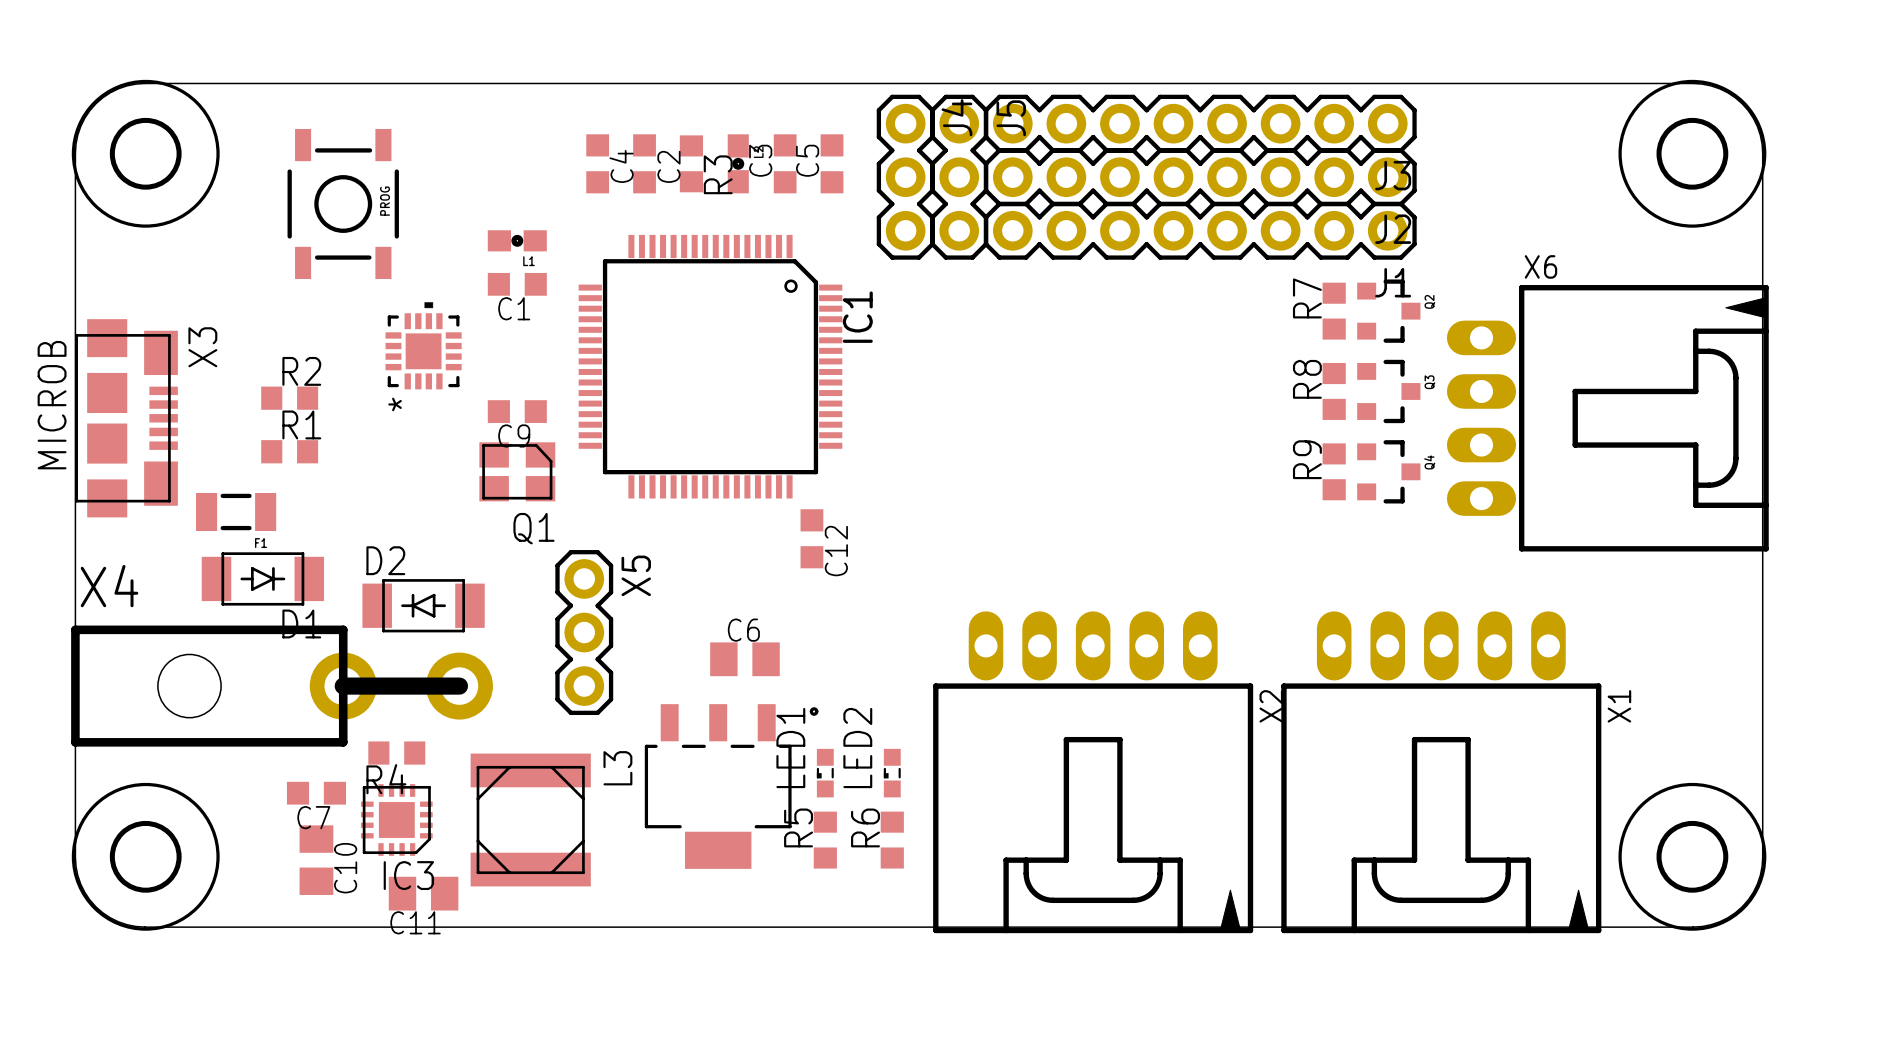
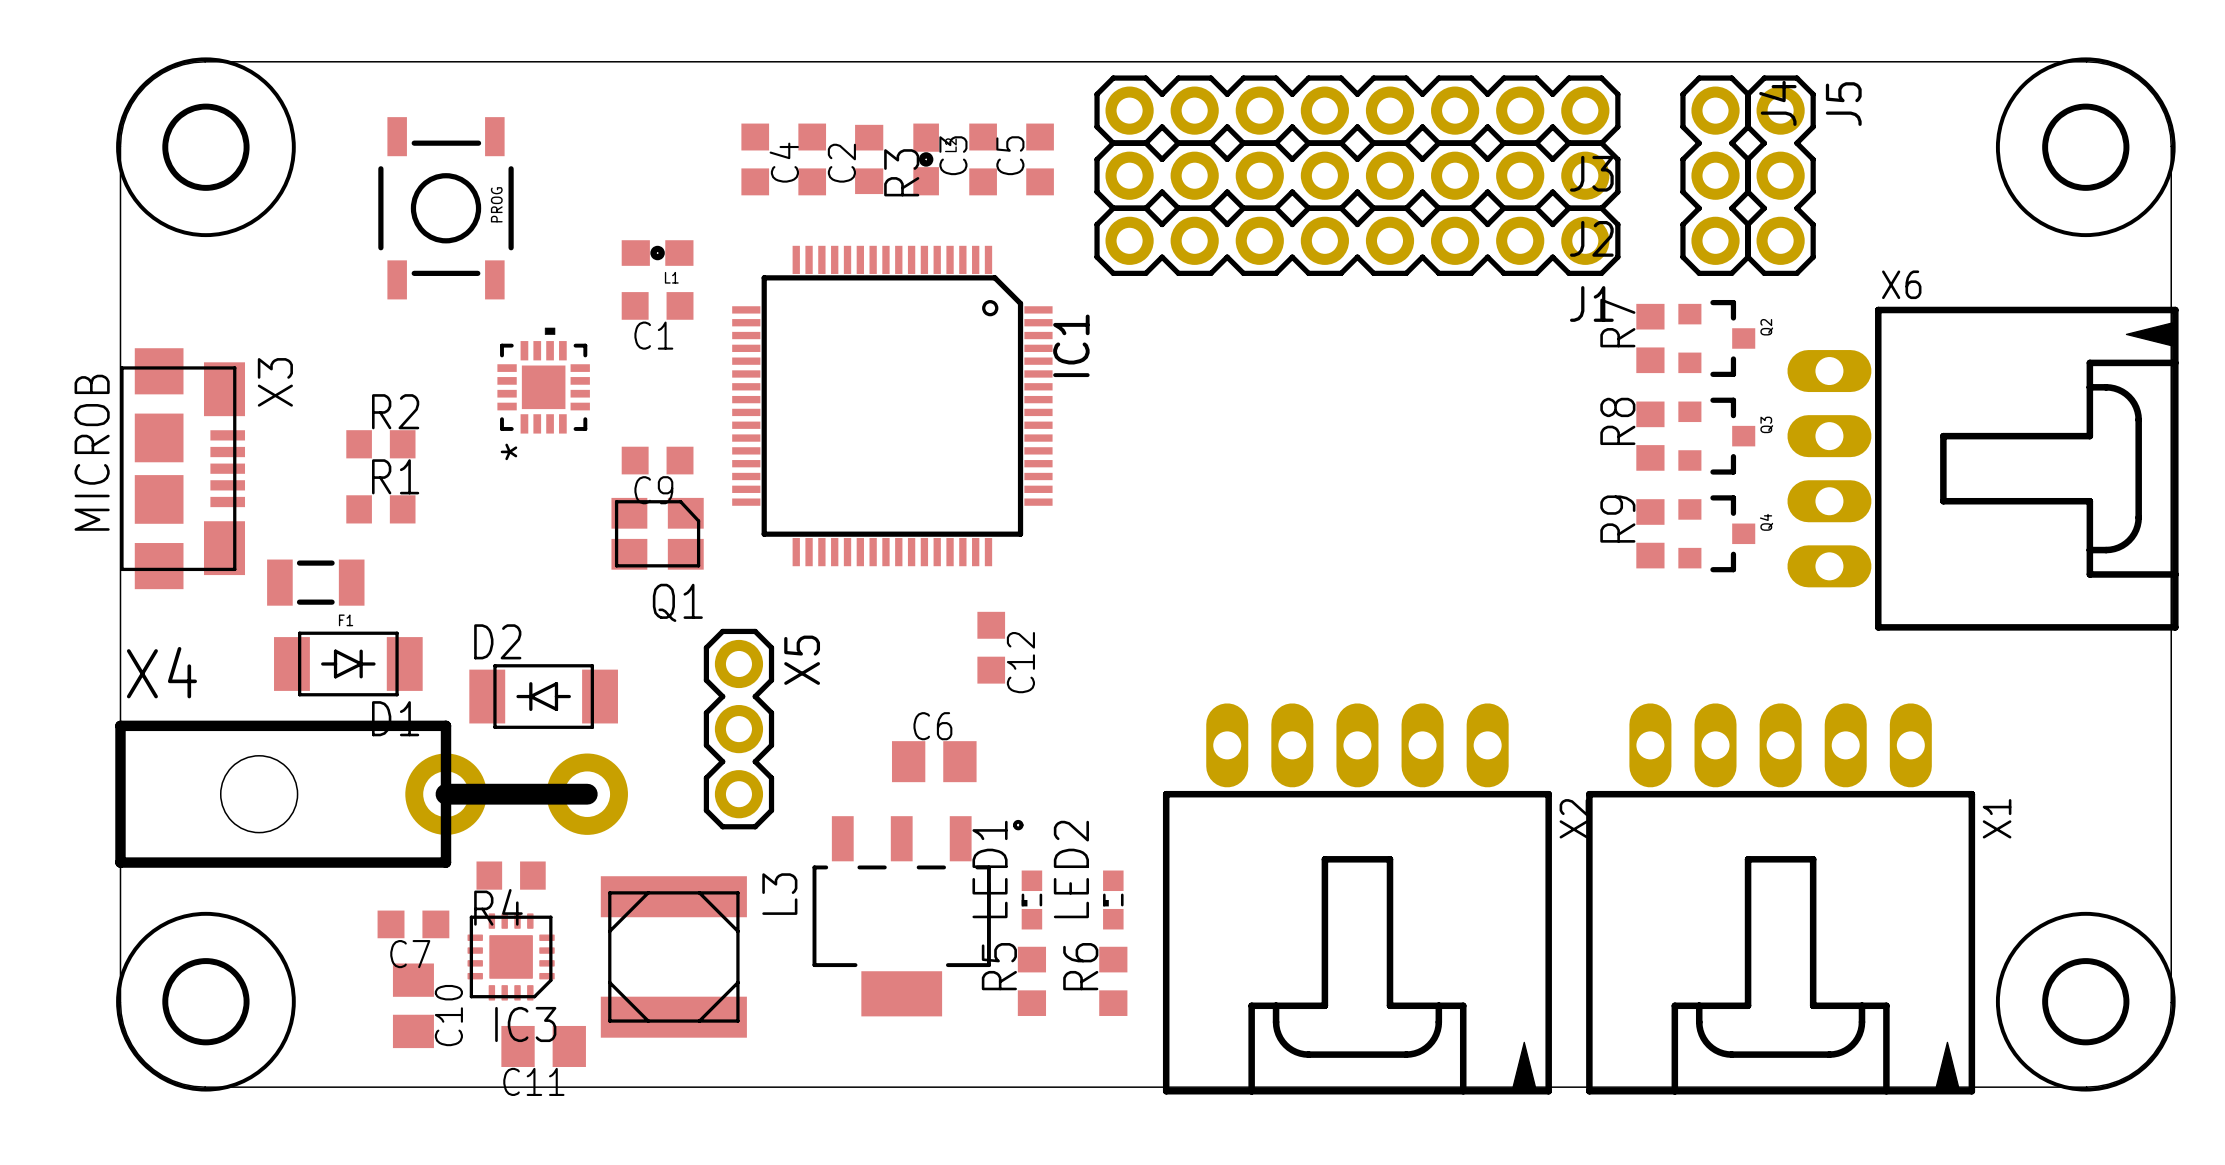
J3 position: (1200, 123) -> (1357, 110)
J4 position: (905, 177) -> (1715, 175)
J5 position: (959, 177) -> (1780, 175)
J2 position: (1200, 177) -> (1357, 175)
J1 position: (1200, 230) -> (1357, 240)
C12 position: (811, 538) -> (991, 647)

